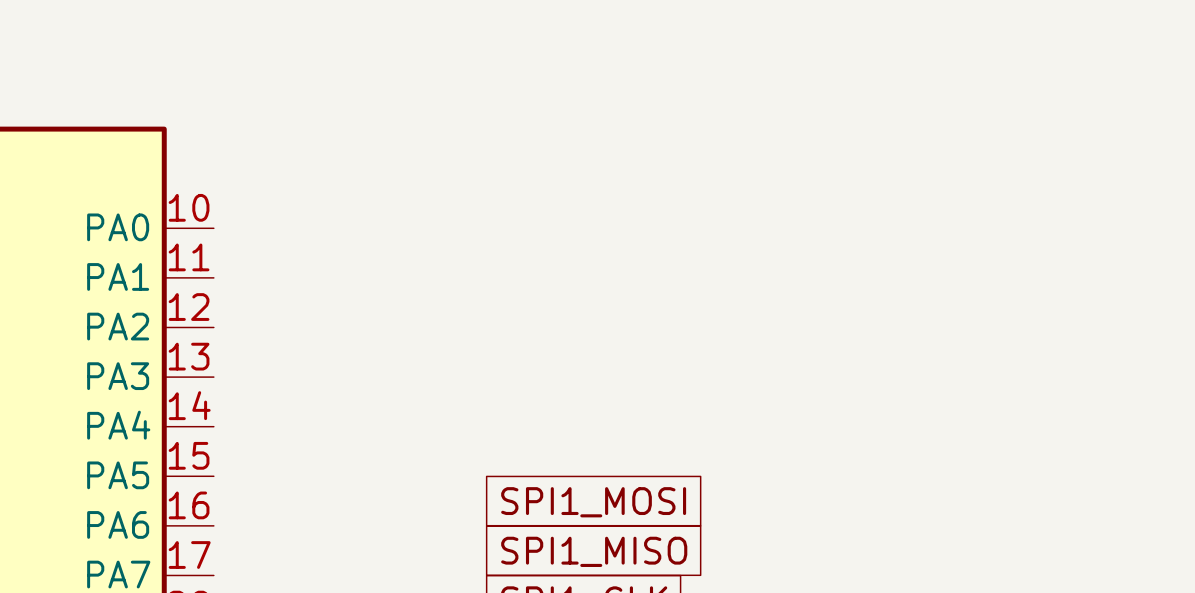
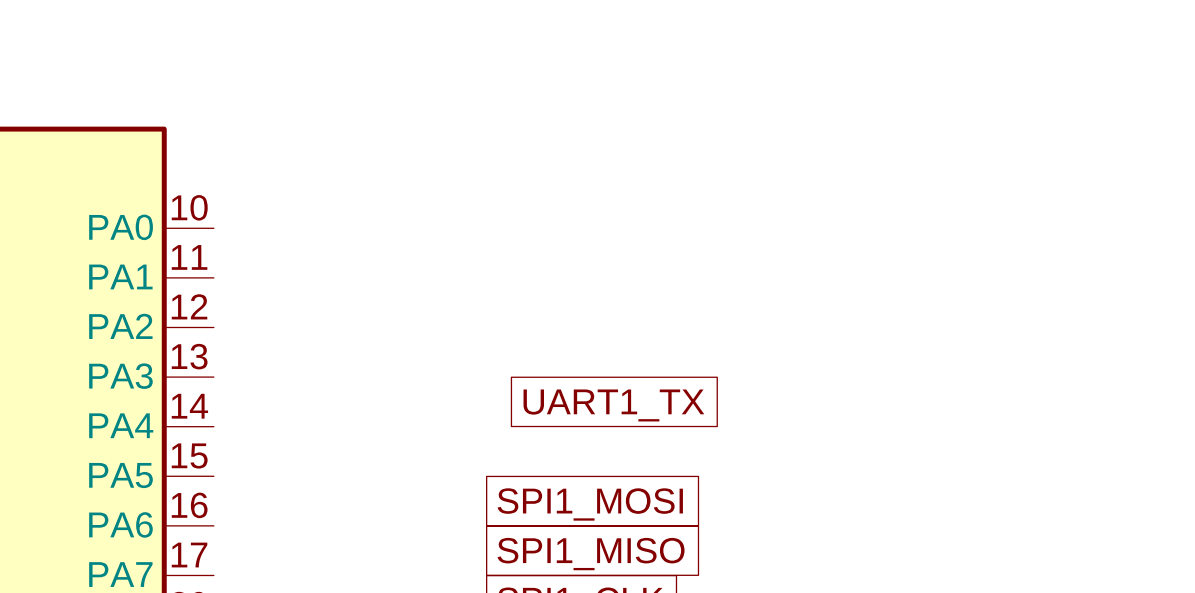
global label: none -> UART1_TX (613, 405)

